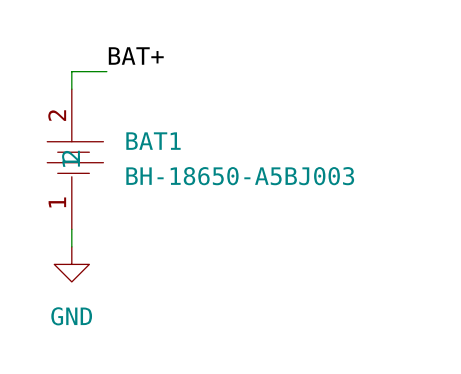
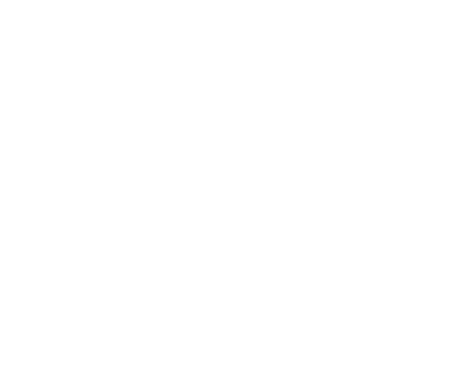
label: BAT+ (136, 56) -> none
wire: (106, 71) (71, 71) (71, 89) -> none
BAT1: BH-18650-A5BJ003 (75, 159) -> none
wire: (71, 229) (71, 246) -> none
power symbol: GND (71, 264) -> none

